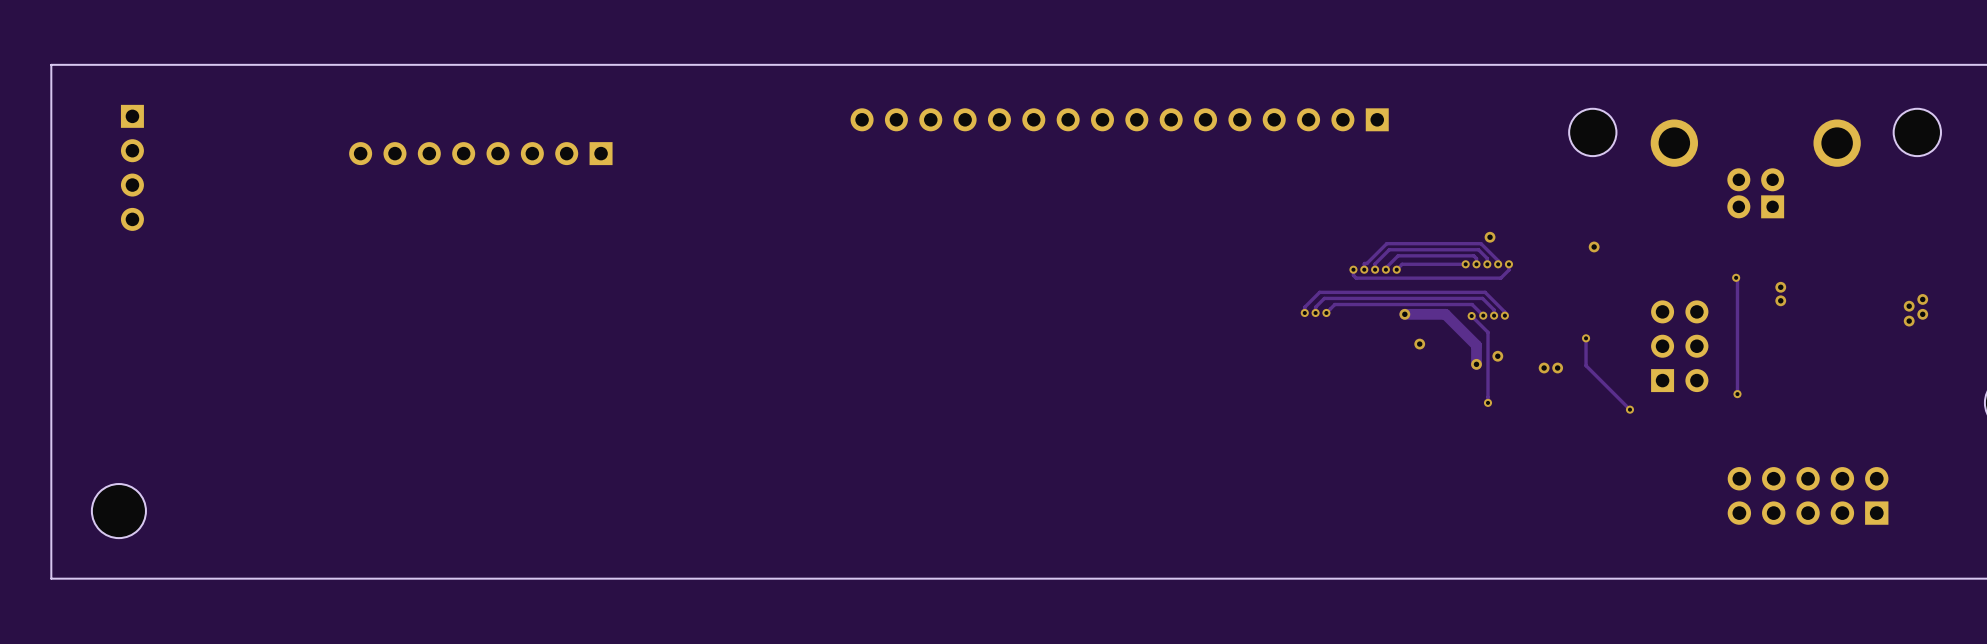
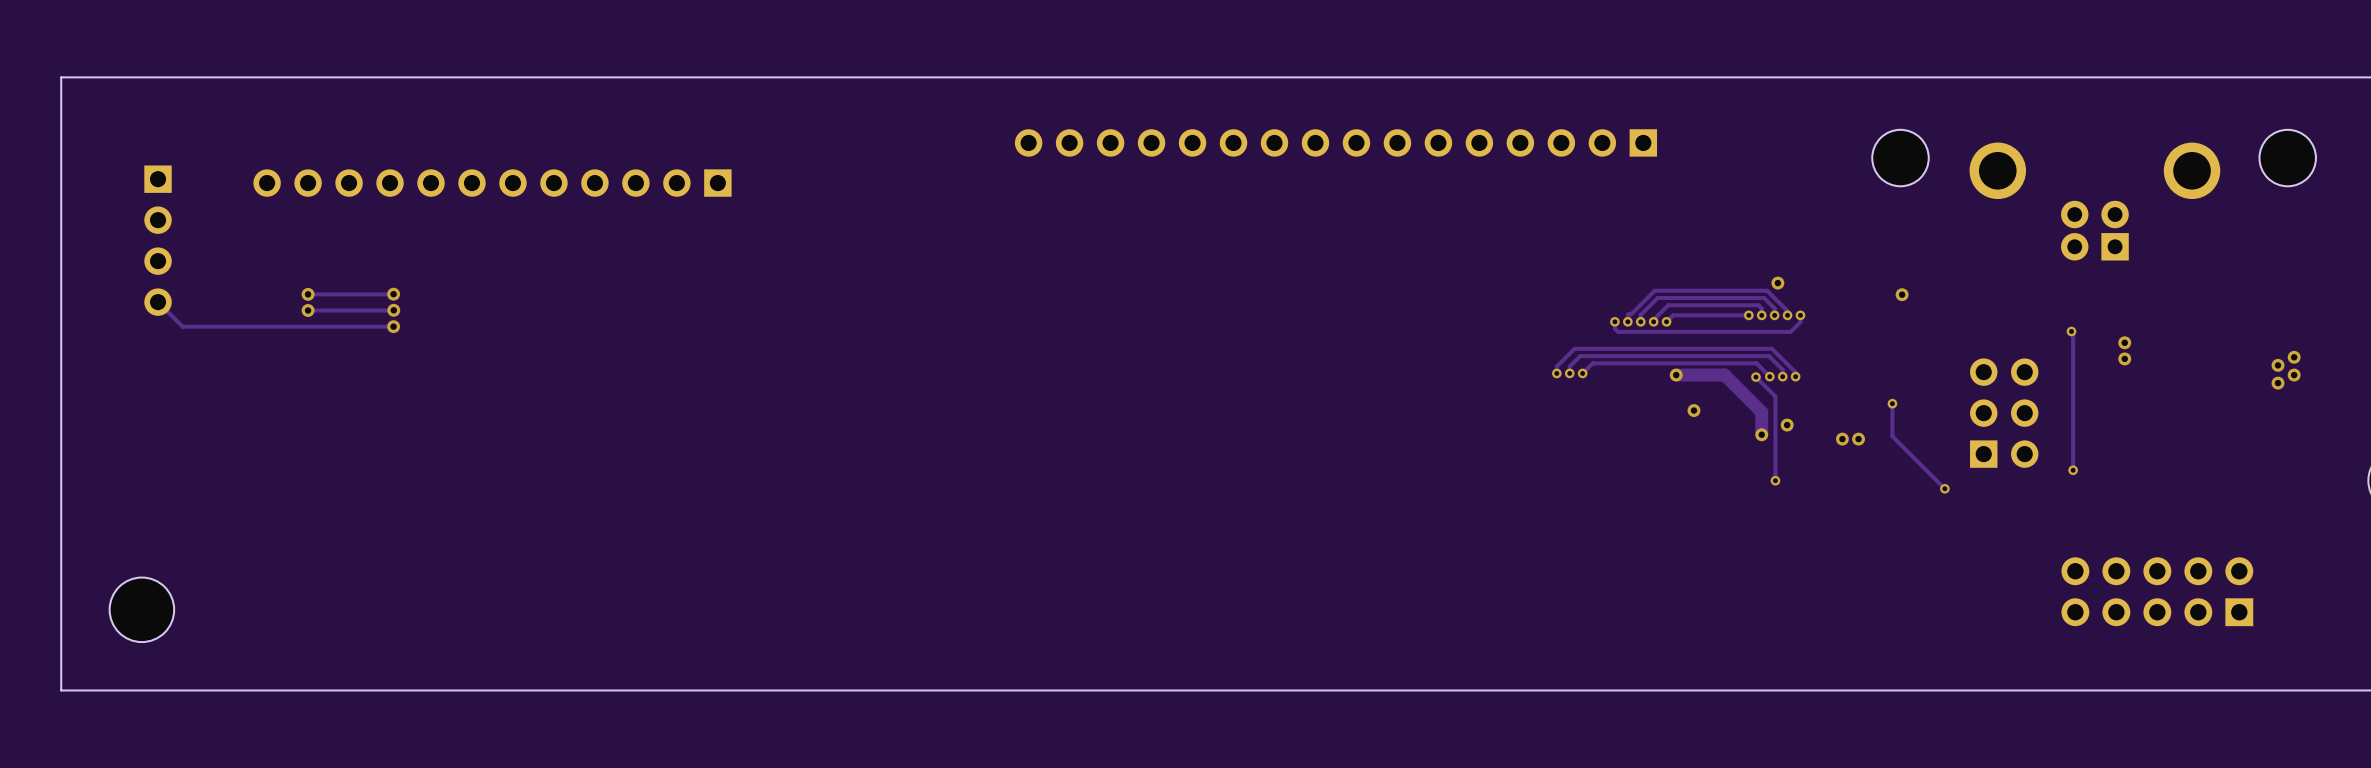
part: none -> (492, 183)
part: (480, 153) -> none
part position: (132, 167) -> (158, 240)
via: none -> (308, 294)
track: none -> (393, 294) (308, 294)
via: none -> (393, 294)
track: none -> (158, 302) (182, 326) (393, 326)
via: none -> (308, 310)
track: none -> (393, 310) (308, 310)
via: none -> (393, 310)
via: none -> (393, 326)

